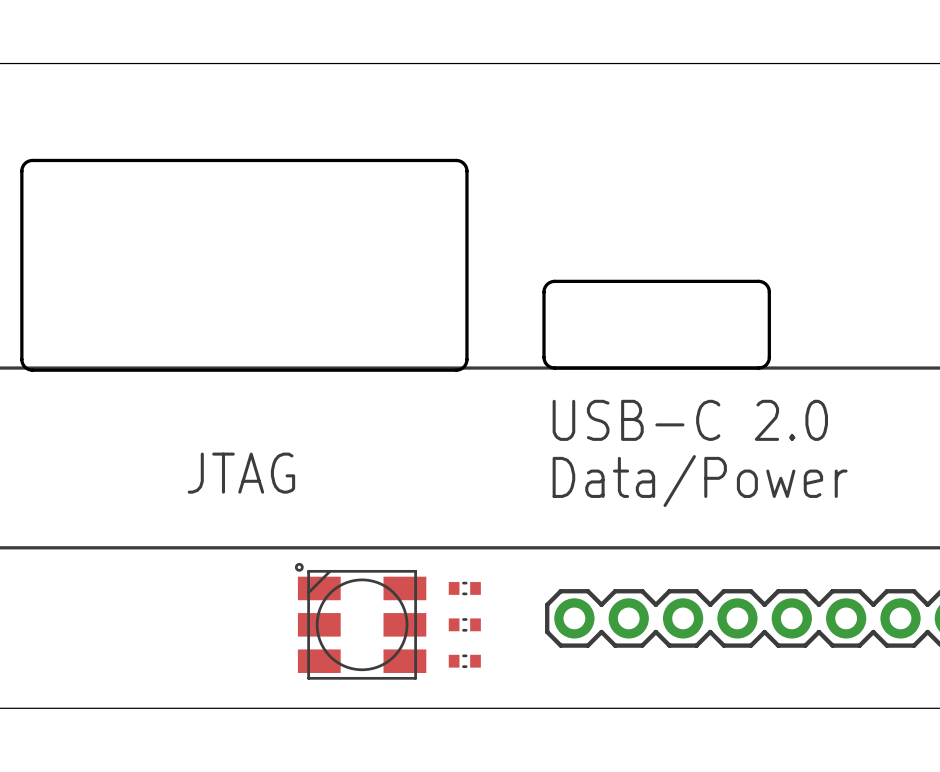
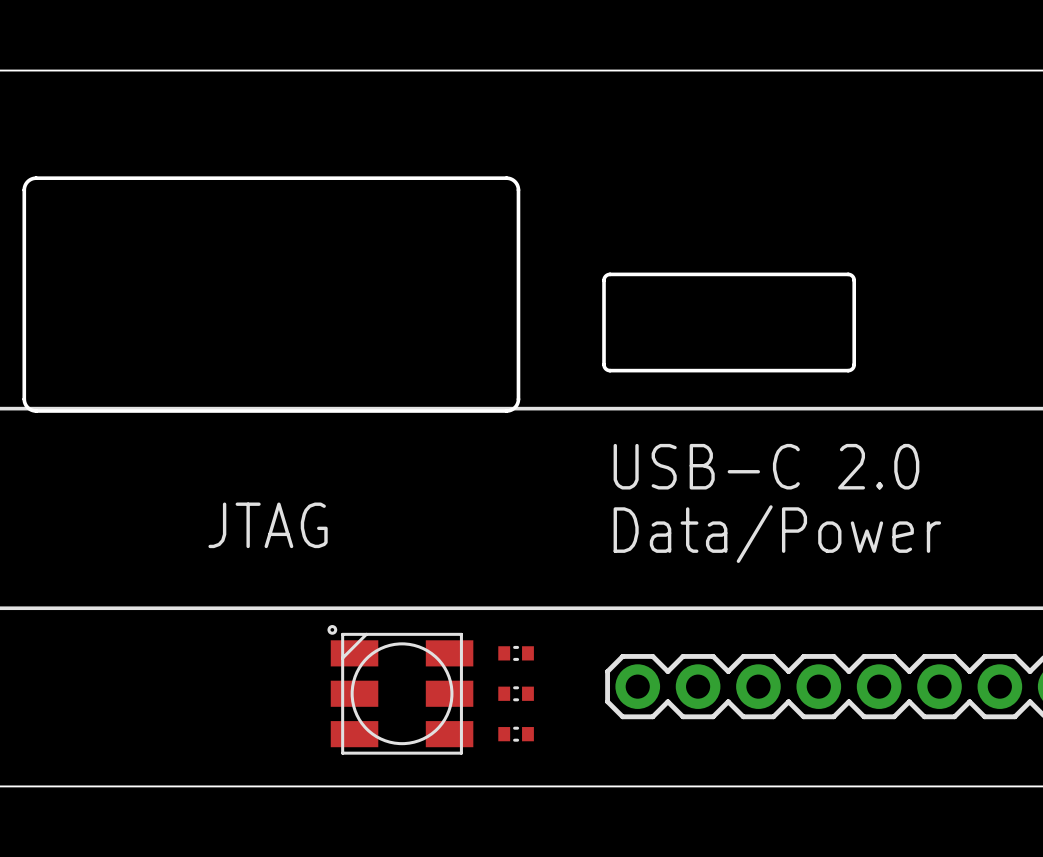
board edge: (544, 292) (547, 284) (554, 281) (758, 281) (766, 284) (769, 292) -> (604, 324) (604, 279) (610, 274) (849, 274) (854, 279) (854, 324)
board edge: (544, 328) (544, 360) (548, 365) (554, 368) (760, 367) (766, 364) (768, 360) (769, 328) -> (604, 364) (605, 368) (610, 370) (848, 370) (852, 368) (854, 364)

